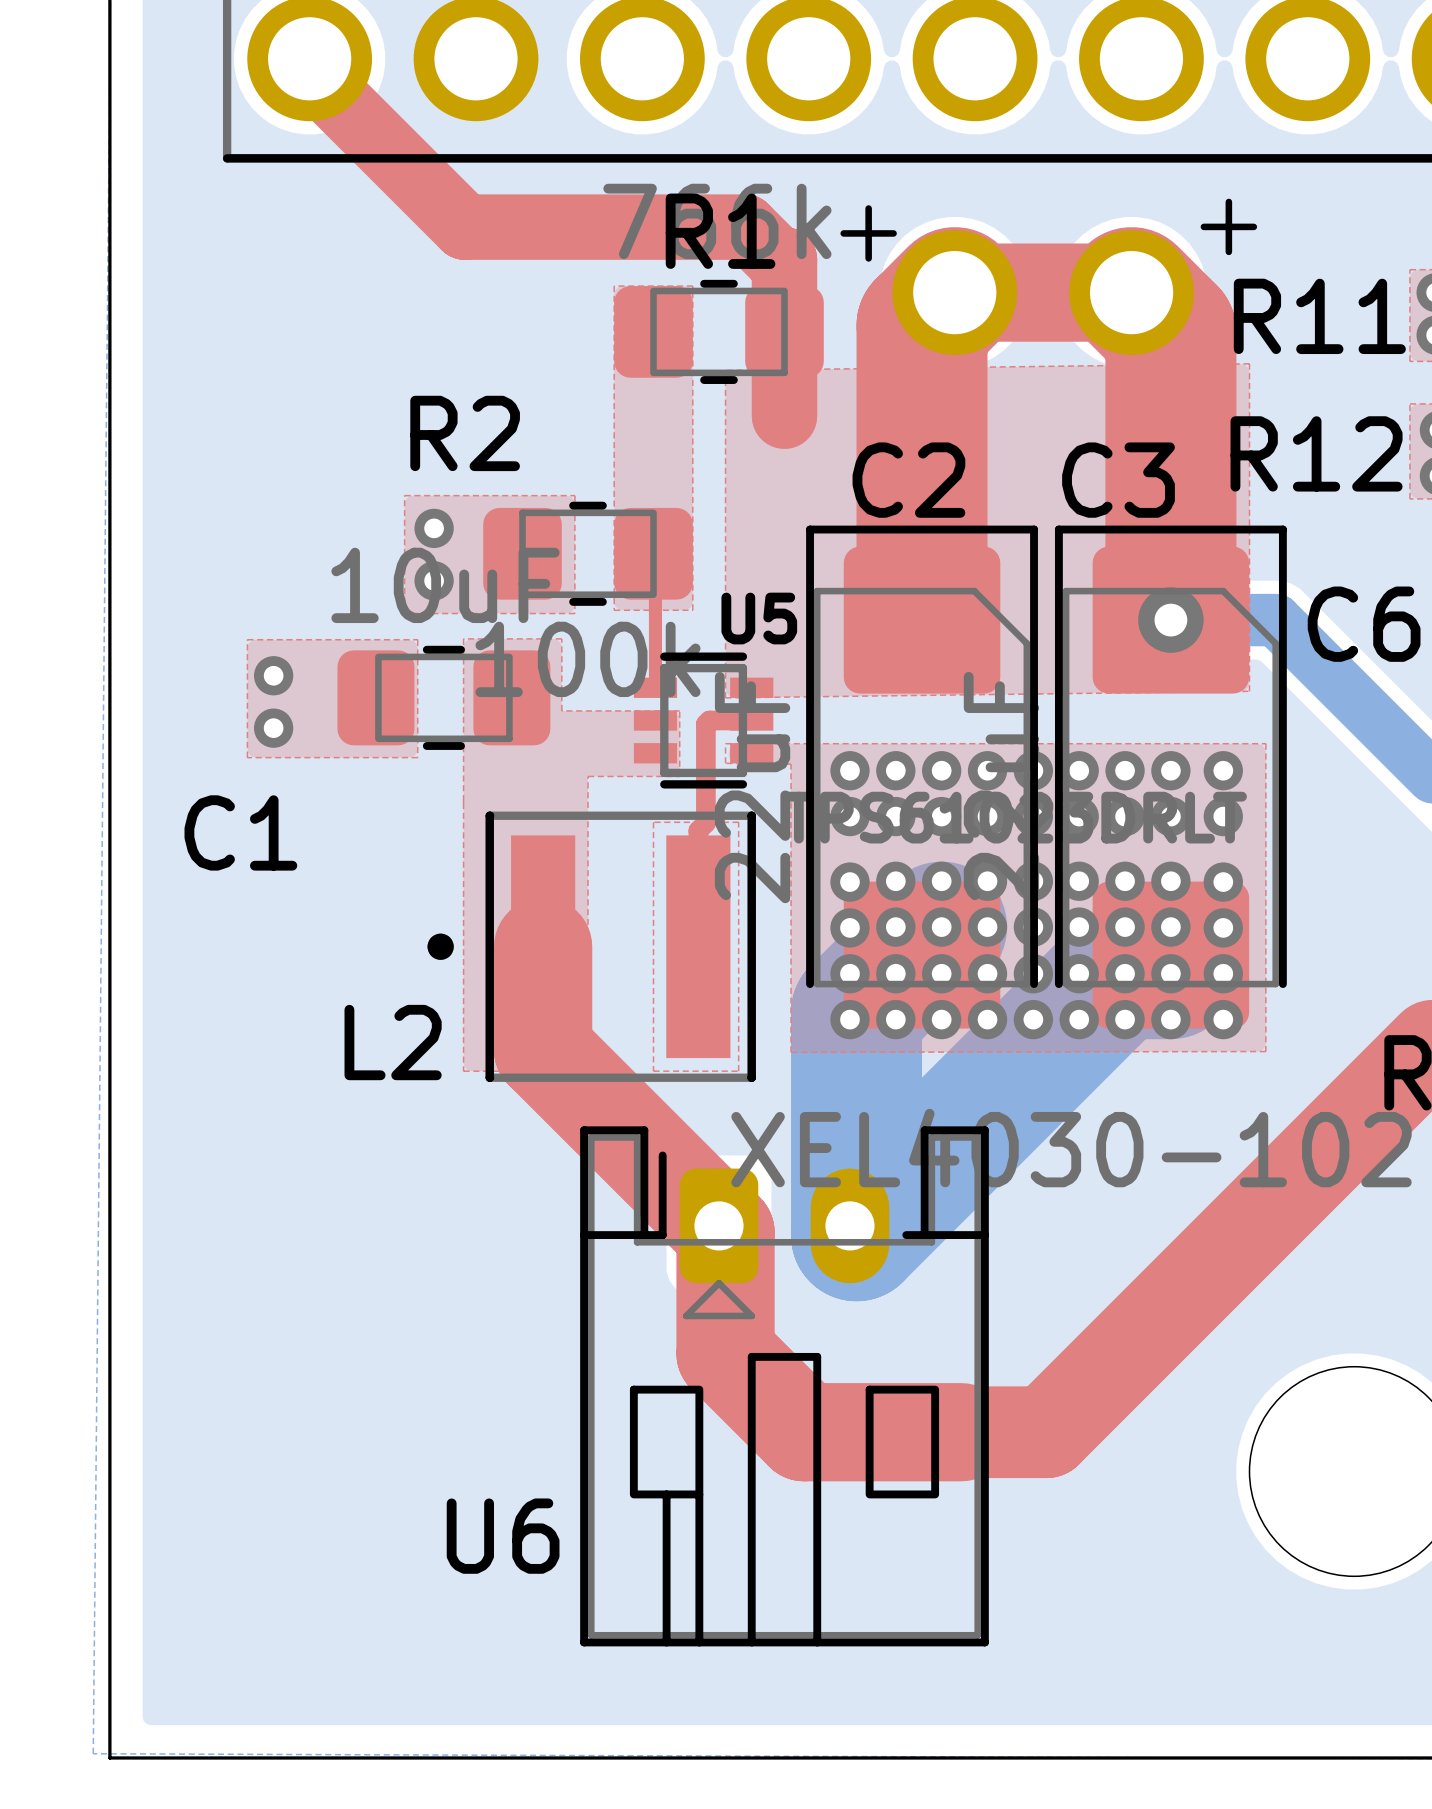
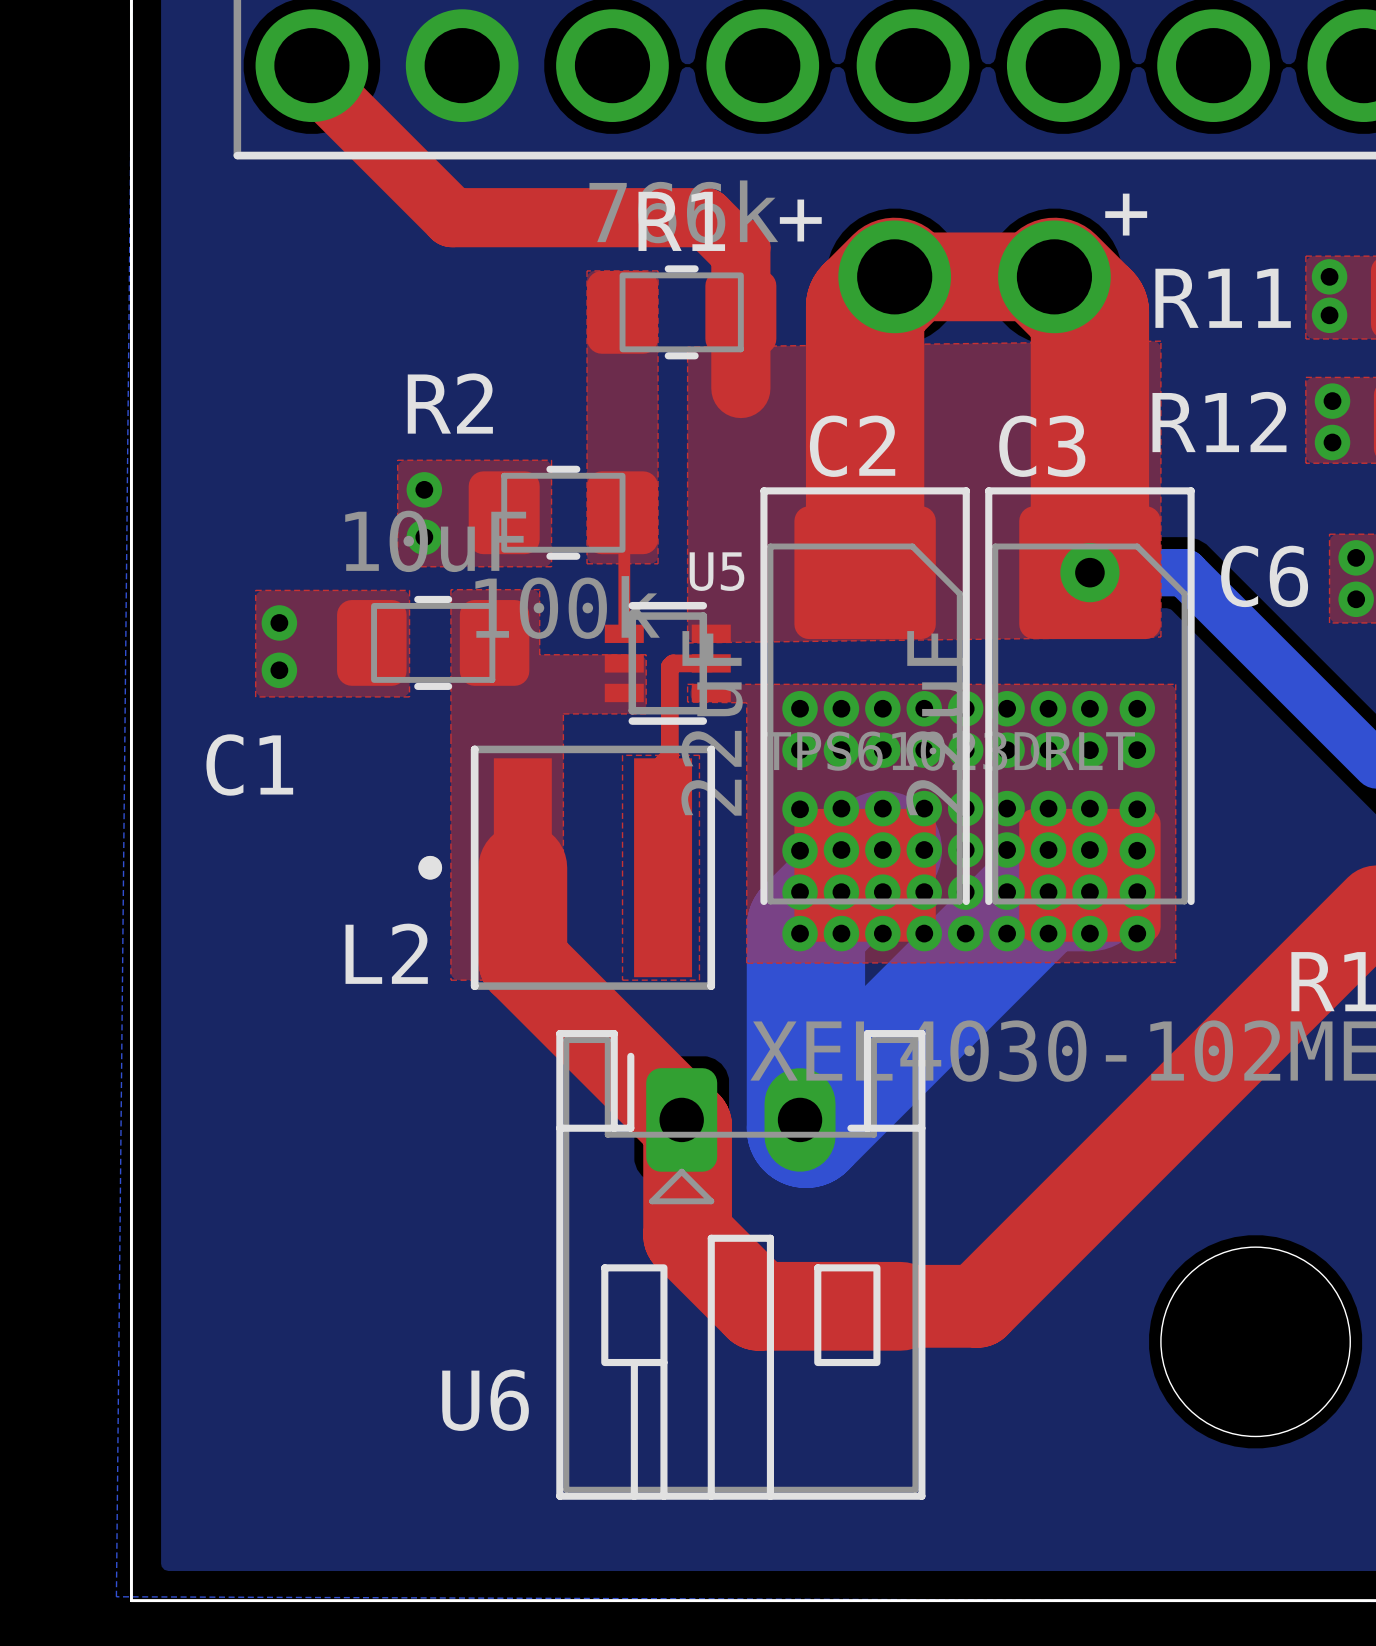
L2 footprint: [427, 811, 756, 1082] -> [418, 745, 716, 990]

